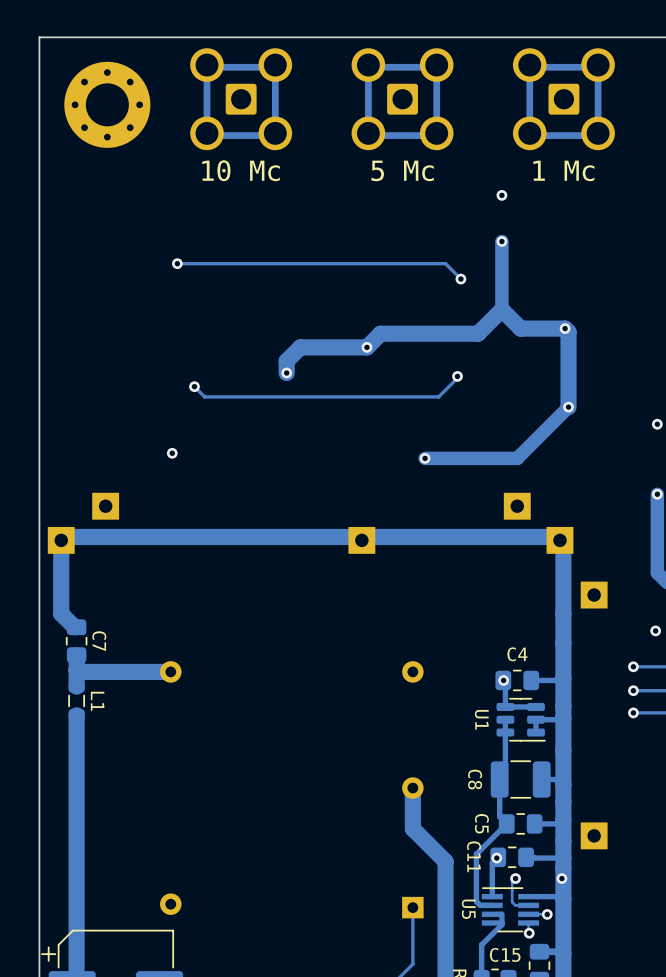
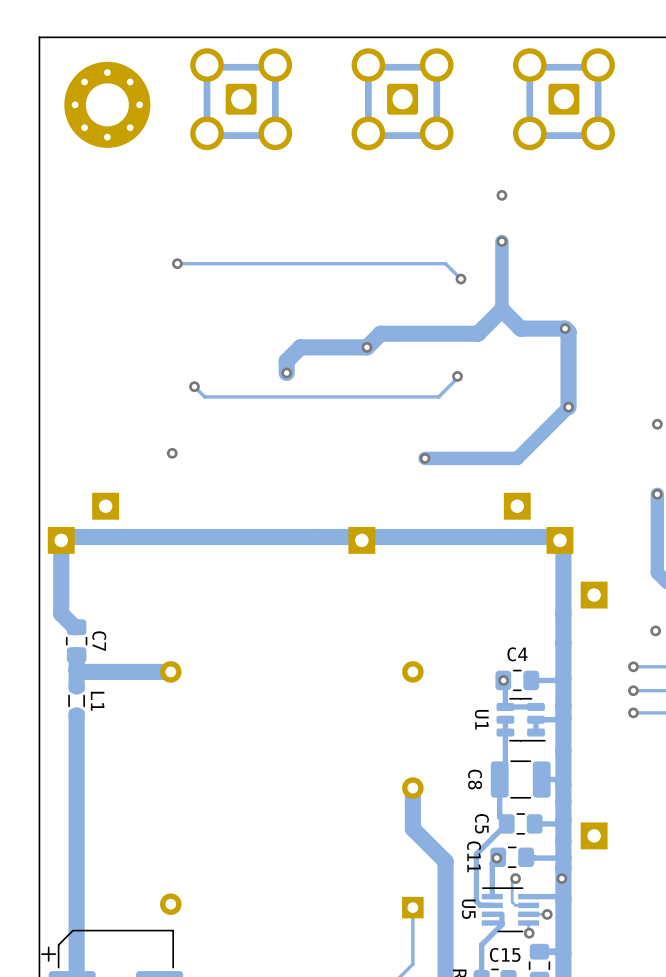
text: 10 Mc (241, 170) -> none
text: 5 Mc (402, 170) -> none
text: 1 Mc (563, 170) -> none

